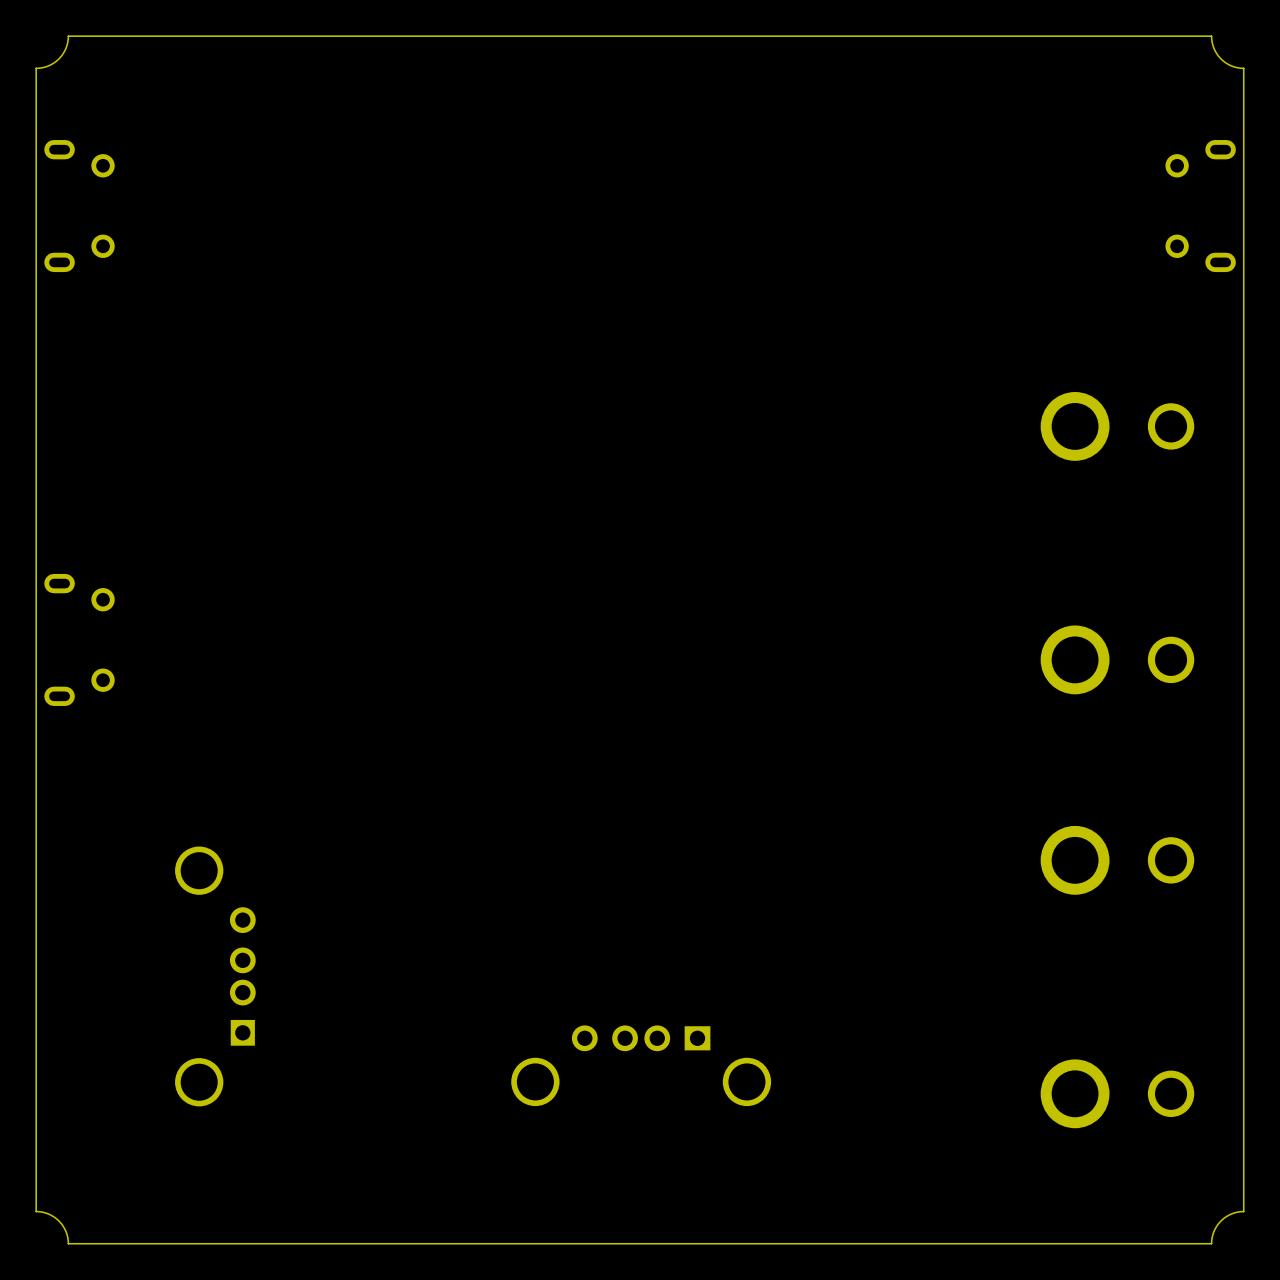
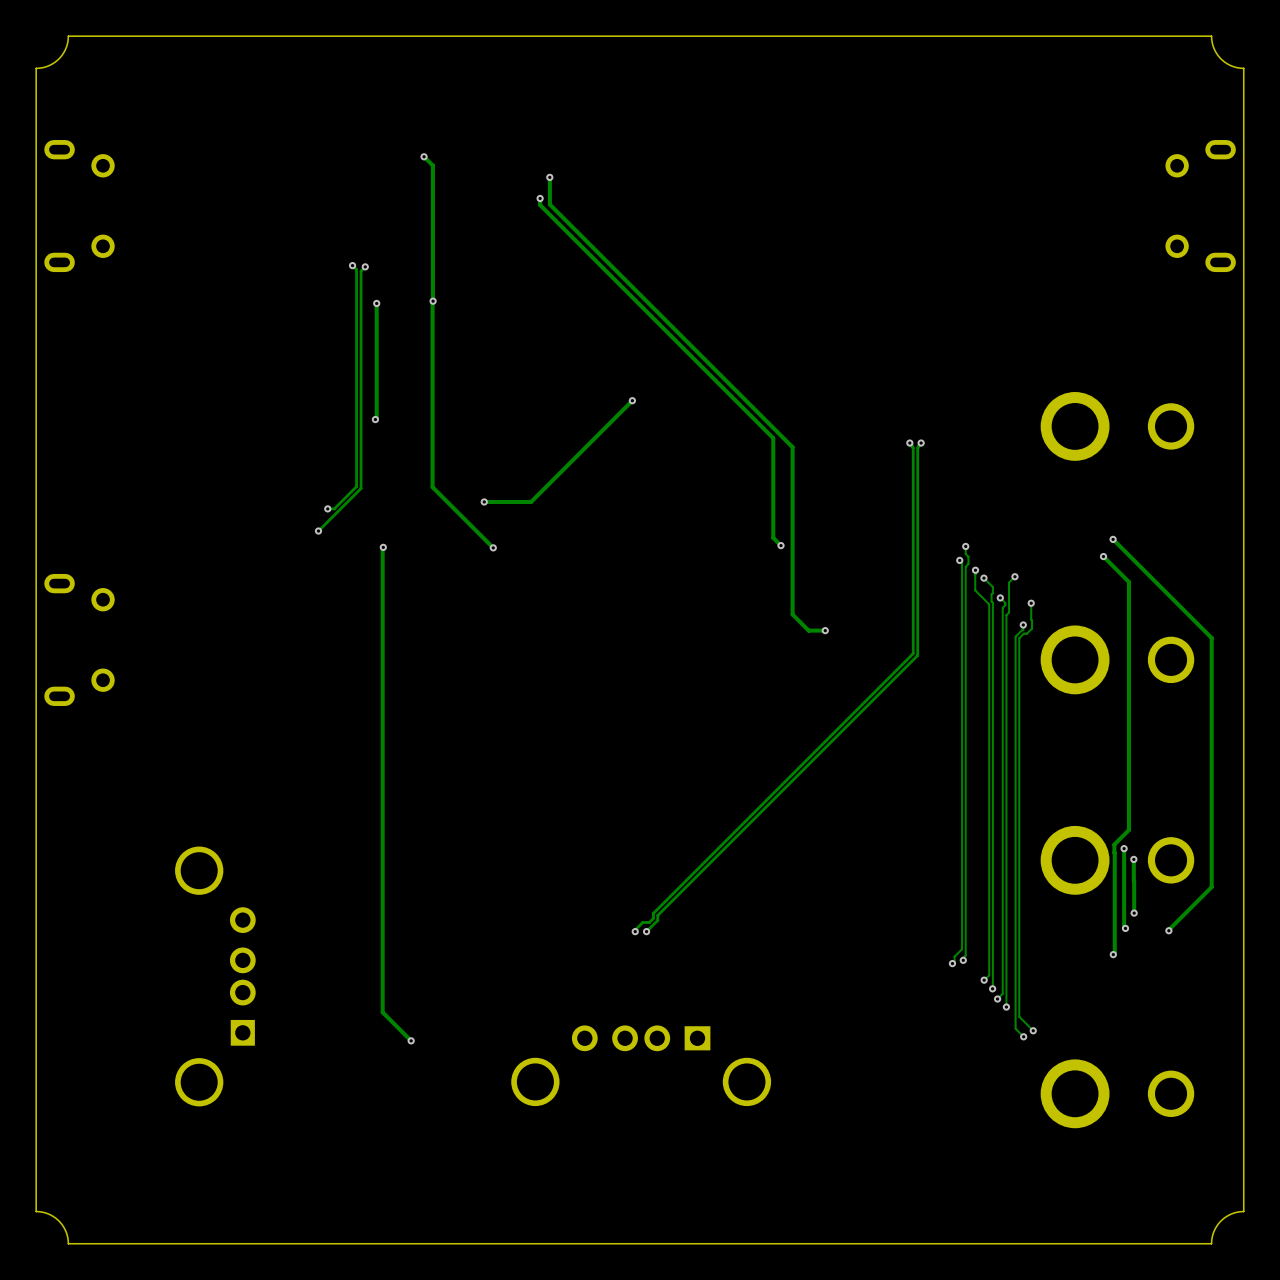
track: none -> (424, 156) (432, 165) (432, 301)
via: none -> (424, 156)
track: none -> (549, 177) (549, 204) (792, 447) (792, 614) (808, 630) (825, 630)
via: none -> (549, 177)
track: none -> (540, 198) (540, 205) (773, 438) (773, 537) (781, 545)
via: none -> (540, 198)
track: none -> (352, 265) (356, 269) (356, 486) (334, 508) (327, 508)
via: none -> (352, 265)
track: none -> (365, 266) (361, 271) (361, 488) (318, 531)
via: none -> (365, 266)
track: none -> (433, 301) (432, 487) (493, 547)
via: none -> (433, 301)
track: none -> (376, 303) (375, 419)
via: none -> (376, 303)
track: none -> (632, 400) (531, 501) (484, 501)
via: none -> (632, 400)
via: none -> (375, 419)
track: none -> (909, 443) (913, 448) (913, 653) (653, 913) (653, 918) (649, 922) (642, 922) (635, 931)
via: none -> (909, 443)
track: none -> (921, 443) (917, 448) (917, 655) (657, 915) (657, 920) (646, 931)
via: none -> (921, 443)
via: none -> (484, 501)
via: none -> (327, 508)
via: none -> (318, 531)
track: none -> (1113, 539) (1211, 638) (1211, 887) (1168, 930)
via: none -> (1113, 539)
via: none -> (781, 545)
track: none -> (965, 546) (968, 564) (965, 566) (965, 955) (963, 960)
via: none -> (965, 546)
track: none -> (383, 547) (382, 1012) (411, 1040)
via: none -> (383, 547)
via: none -> (493, 547)
track: none -> (1103, 556) (1128, 582) (1128, 830) (1114, 844) (1113, 954)
via: none -> (1103, 556)
track: none -> (959, 560) (962, 562) (962, 949) (954, 956) (952, 963)
via: none -> (959, 560)
track: none -> (975, 570) (975, 590) (989, 604) (989, 975) (984, 980)
via: none -> (975, 570)
track: none -> (1014, 576) (1009, 582) (1009, 612) (1006, 615) (1006, 1007)
via: none -> (1014, 576)
track: none -> (983, 578) (992, 587) (992, 988)
via: none -> (983, 578)
track: none -> (1000, 597) (1005, 602) (1002, 607) (1002, 993) (997, 999)
via: none -> (1000, 597)
track: none -> (1031, 603) (1032, 628) (1019, 638) (1019, 1016) (1033, 1030)
via: none -> (1031, 603)
track: none -> (1023, 624) (1023, 630) (1015, 636) (1015, 1028) (1023, 1036)
via: none -> (1023, 624)
via: none -> (825, 630)
track: none -> (1124, 848) (1125, 928)
via: none -> (1124, 848)
track: none -> (1133, 859) (1134, 913)
via: none -> (1133, 859)
via: none -> (1134, 913)
via: none -> (1125, 928)
via: none -> (1168, 930)
via: none -> (635, 931)
via: none -> (646, 931)
via: none -> (1113, 954)
via: none -> (963, 960)
via: none -> (952, 963)
via: none -> (984, 980)
via: none -> (992, 988)
via: none -> (997, 999)
via: none -> (1006, 1007)
via: none -> (1033, 1030)
via: none -> (1023, 1036)
via: none -> (411, 1040)

